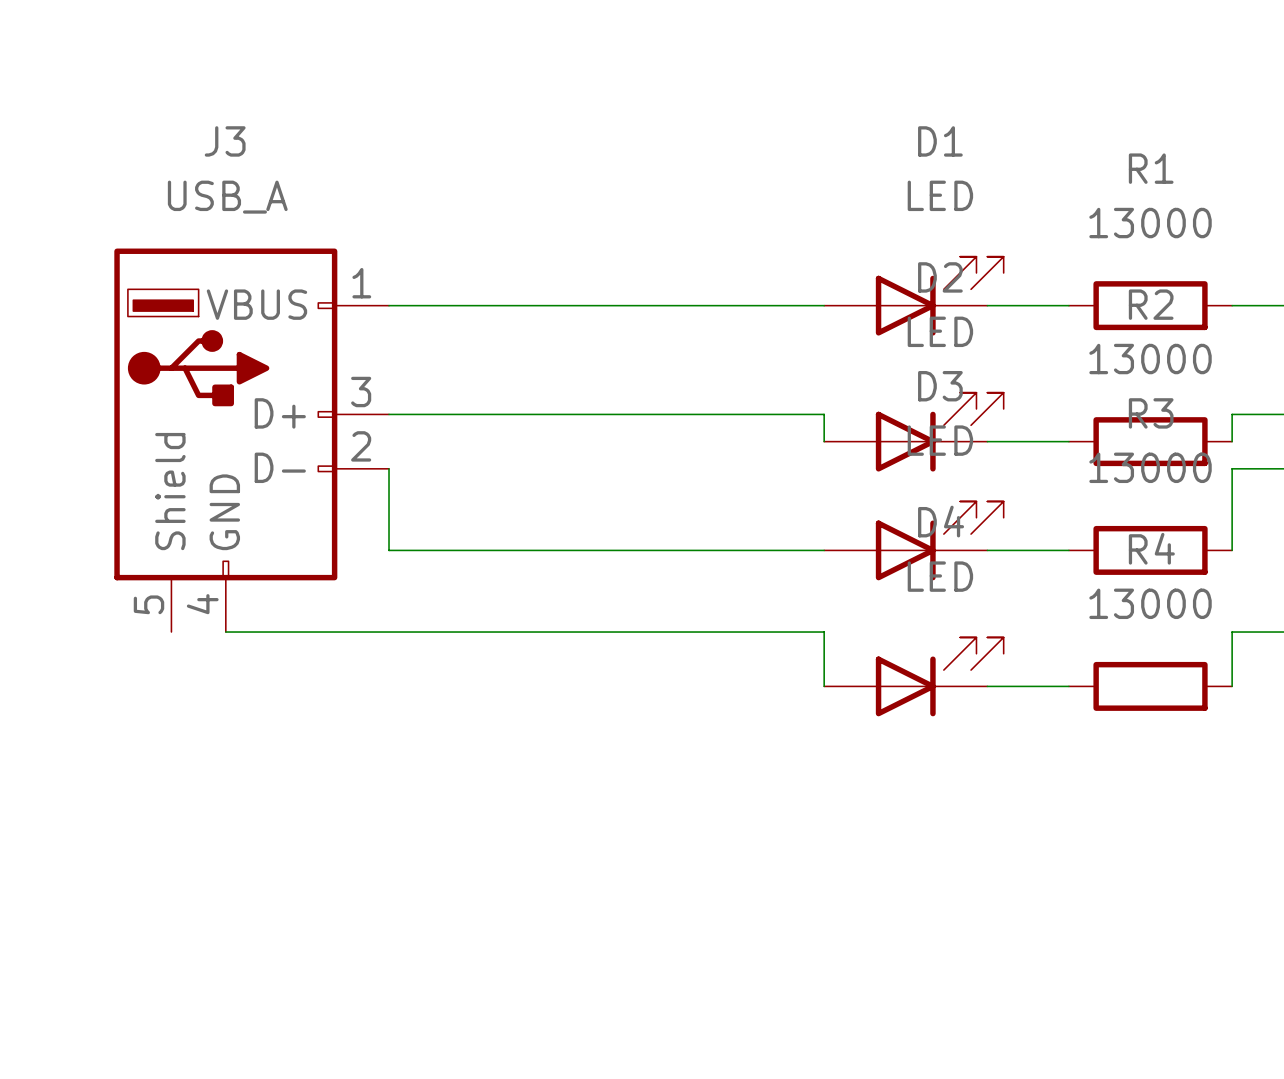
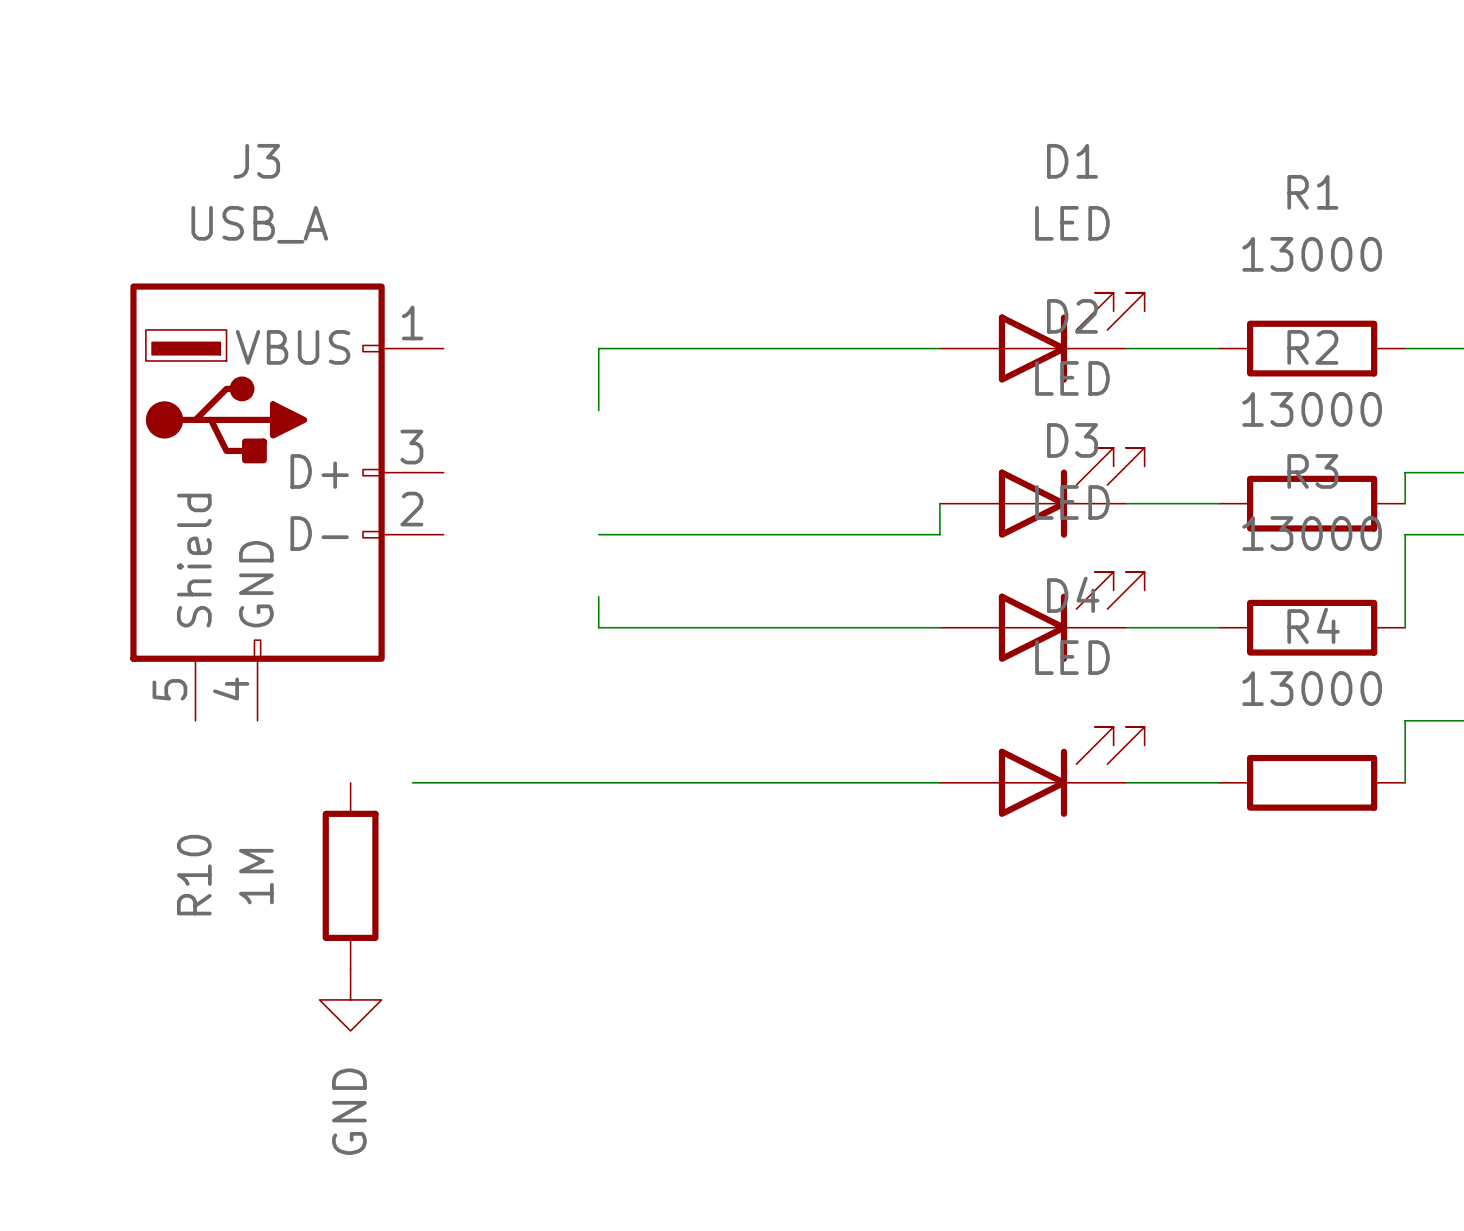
wire: (389, 305) (524, 305) -> (598, 410) (598, 348)
wire: (389, 414) (824, 414) (824, 441) -> (598, 534) (939, 534) (939, 503)
wire: (389, 468) (389, 550) (524, 550) -> (598, 596) (598, 627)
wire: (225, 632) (824, 632) (824, 686) -> (412, 782) (939, 782)
R10: none -> 1M (350, 875)
power symbol: none -> GND (350, 999)

